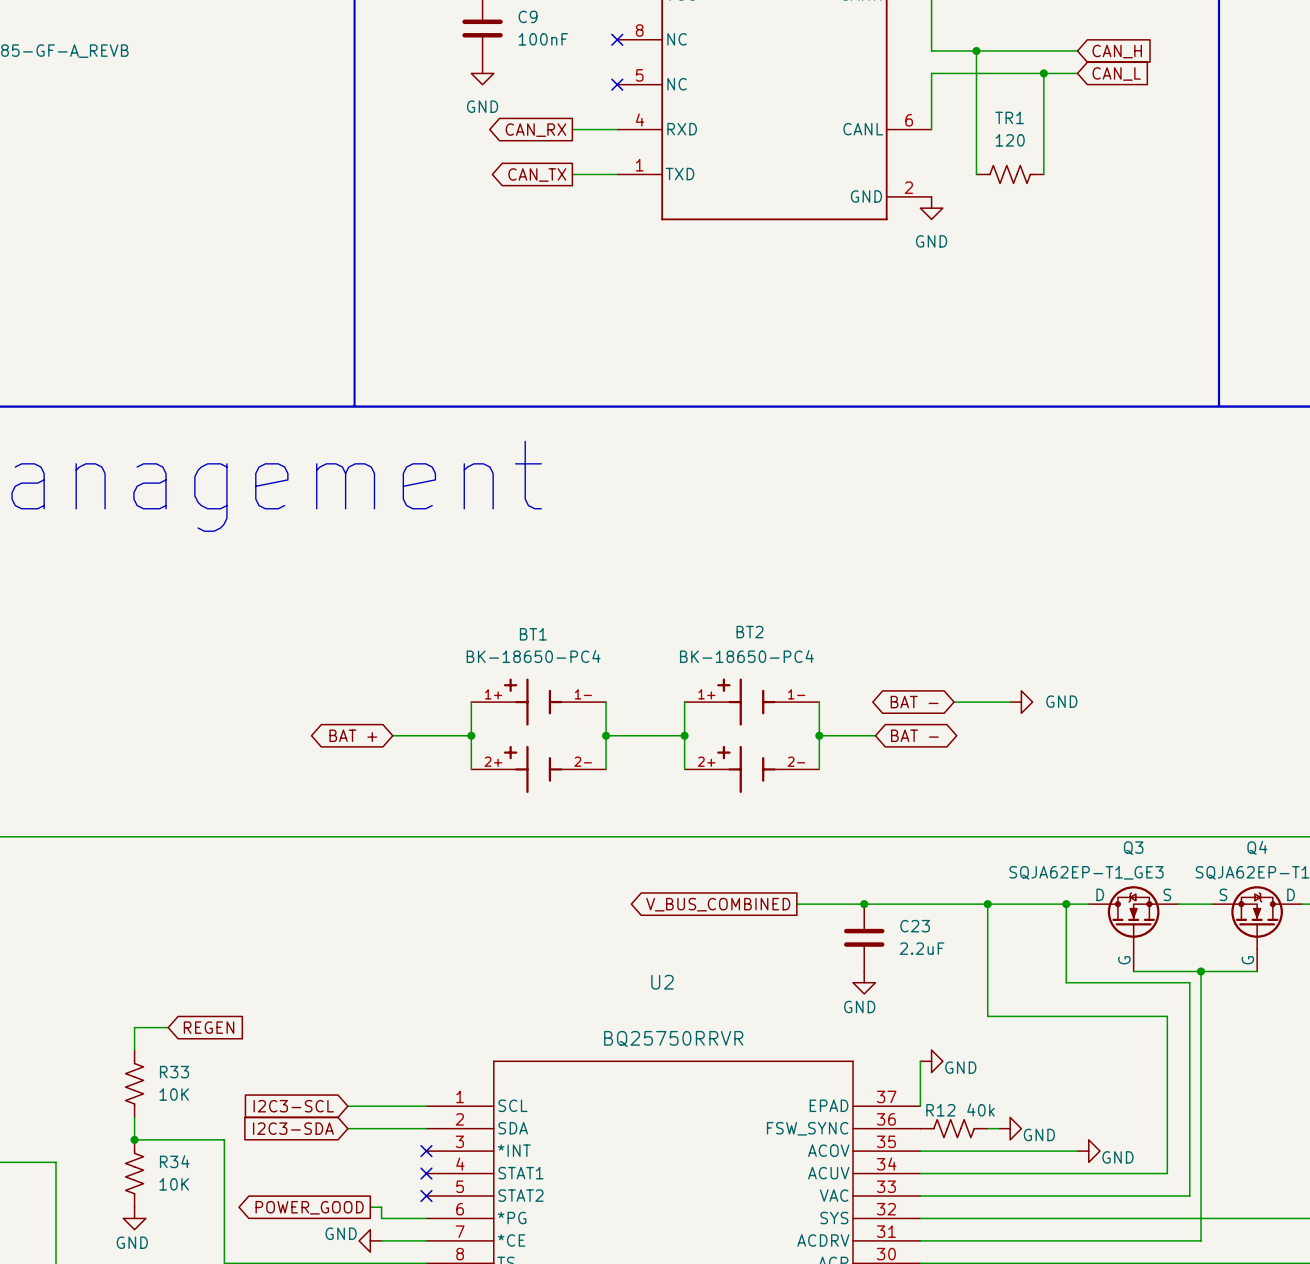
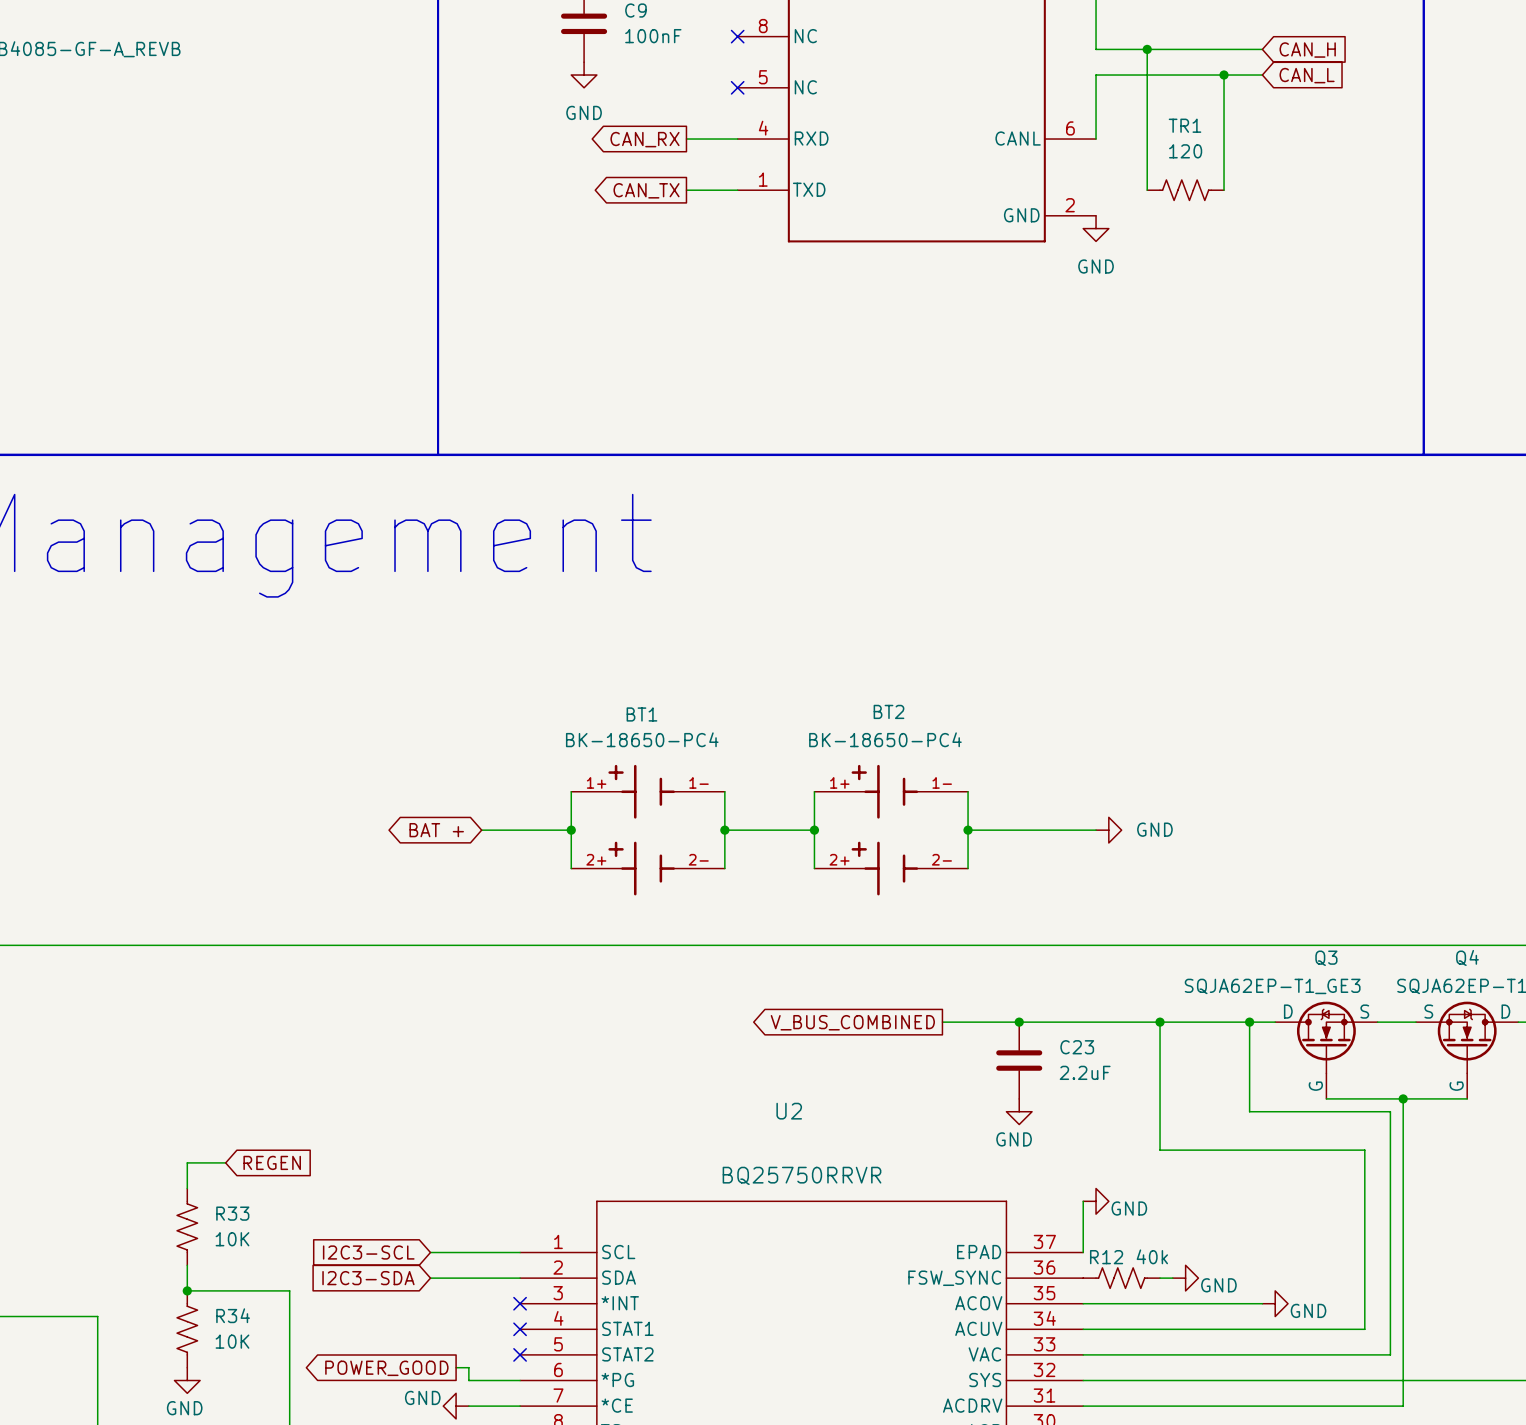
global label: BAT - (914, 702) -> none
wire: (954, 702) (1010, 702) -> (1032, 830) (1096, 830)
power symbol position: GND (1021, 702) -> GND (1108, 830)
global label: BAT - (914, 735) -> none

